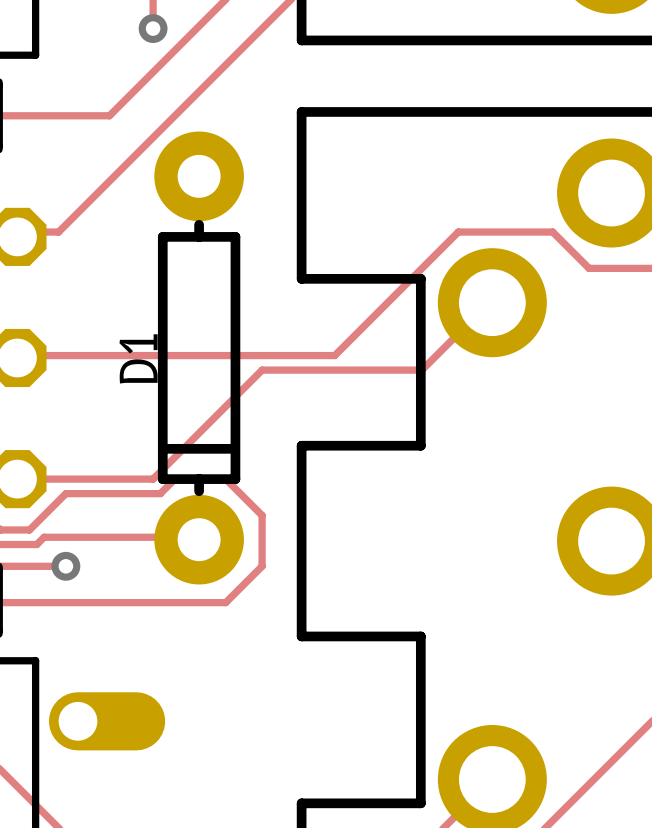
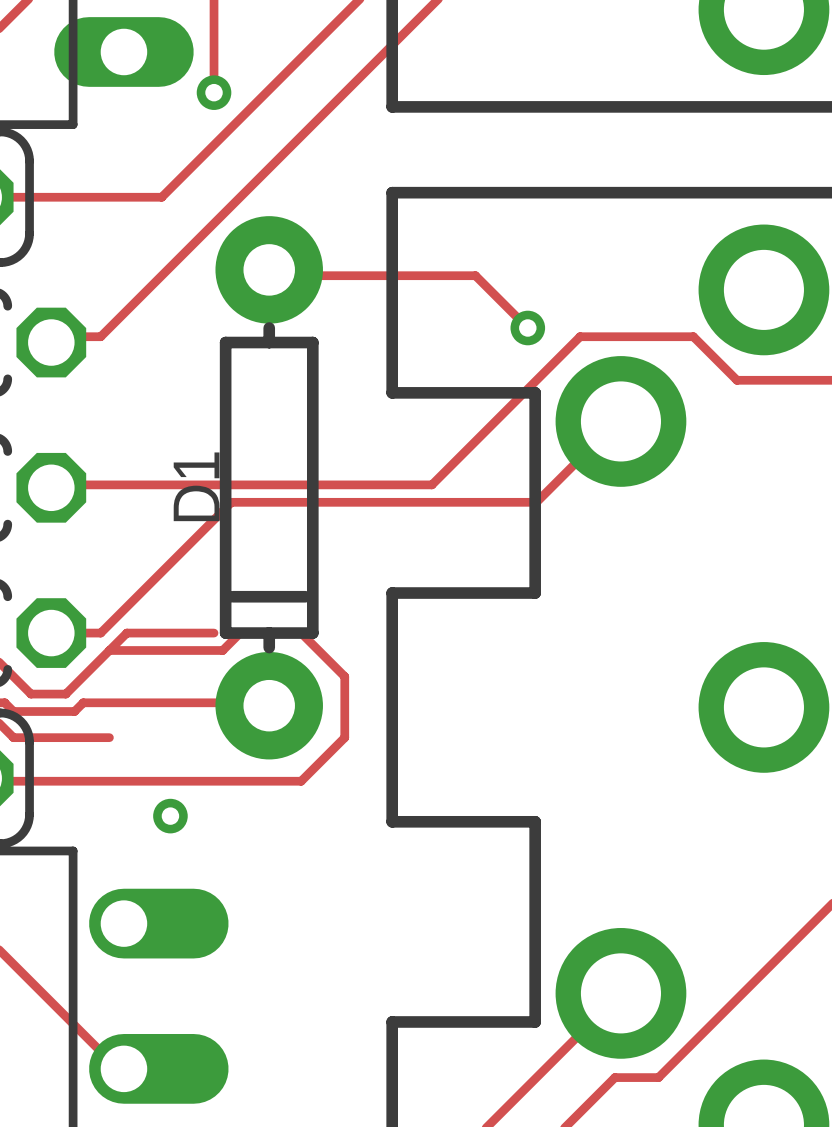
track: none -> (269, 269) (275, 275) (475, 275) (527, 328)
via: none -> (527, 328)
track: (262, 370) (153, 479) -> (344, 502) (231, 502) (100, 633)
track: (58, 479) (80, 479) -> (109, 650) (126, 633)
via position: (65, 566) -> (170, 816)

